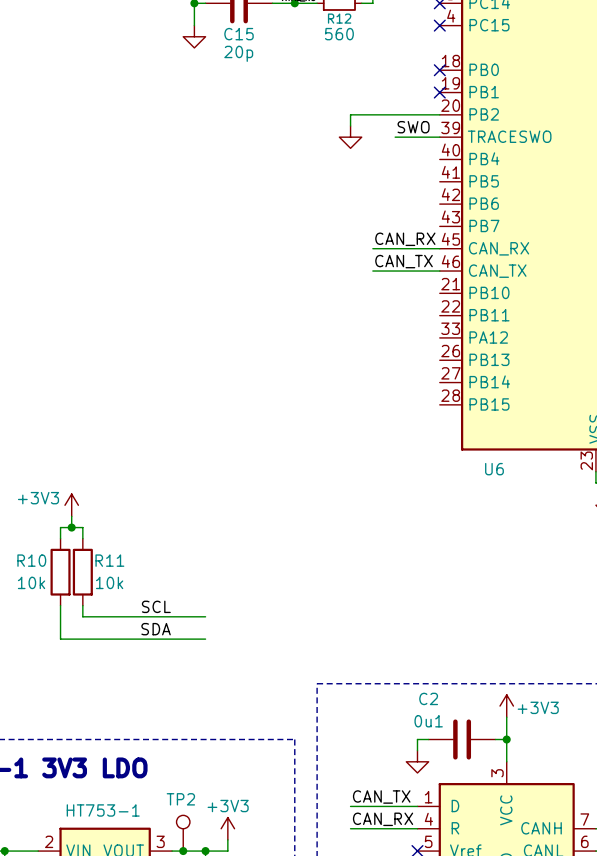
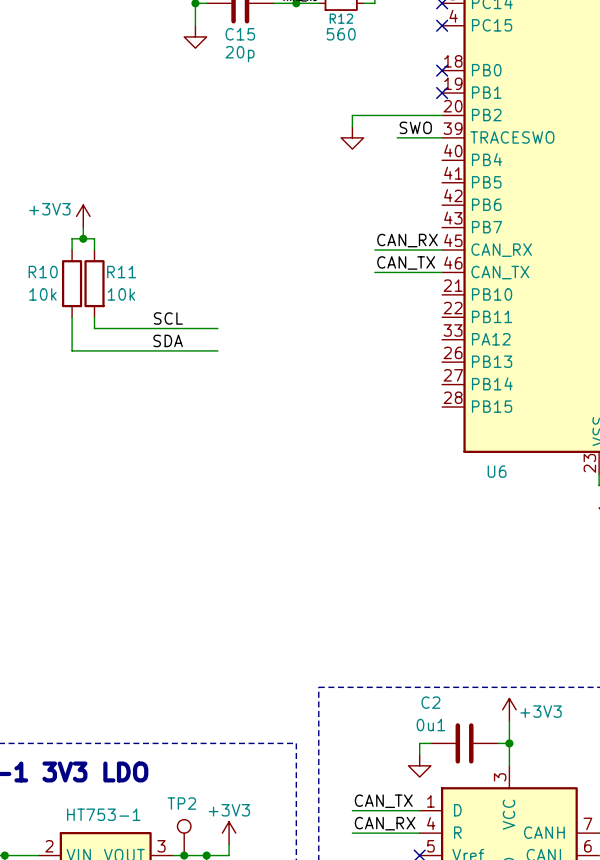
power symbol: none -> +3V3 (83, 216)
wire: none -> (83, 227) (83, 238)
junction: none -> (83, 238)
wire: none -> (72, 250) (72, 238) (94, 238) (94, 250)
wire: none -> (72, 317) (72, 350) (217, 350)
wire: none -> (94, 317) (94, 328) (217, 328)
label: none -> SCL (168, 318)
label: none -> SDA (168, 340)
power symbol: +3V3 (71, 505) -> none
wire: (71, 516) (71, 527) -> none
junction: (71, 527) -> none
wire: (60, 538) (60, 527) (82, 527) (82, 538) -> none
R10 position: (60, 572) -> (72, 283)
R11 position: (82, 572) -> (94, 283)
wire: (60, 605) (60, 639) (205, 639) -> none
wire: (82, 605) (82, 616) (205, 616) -> none
label: SCL (156, 606) -> none
label: SDA (156, 629) -> none

